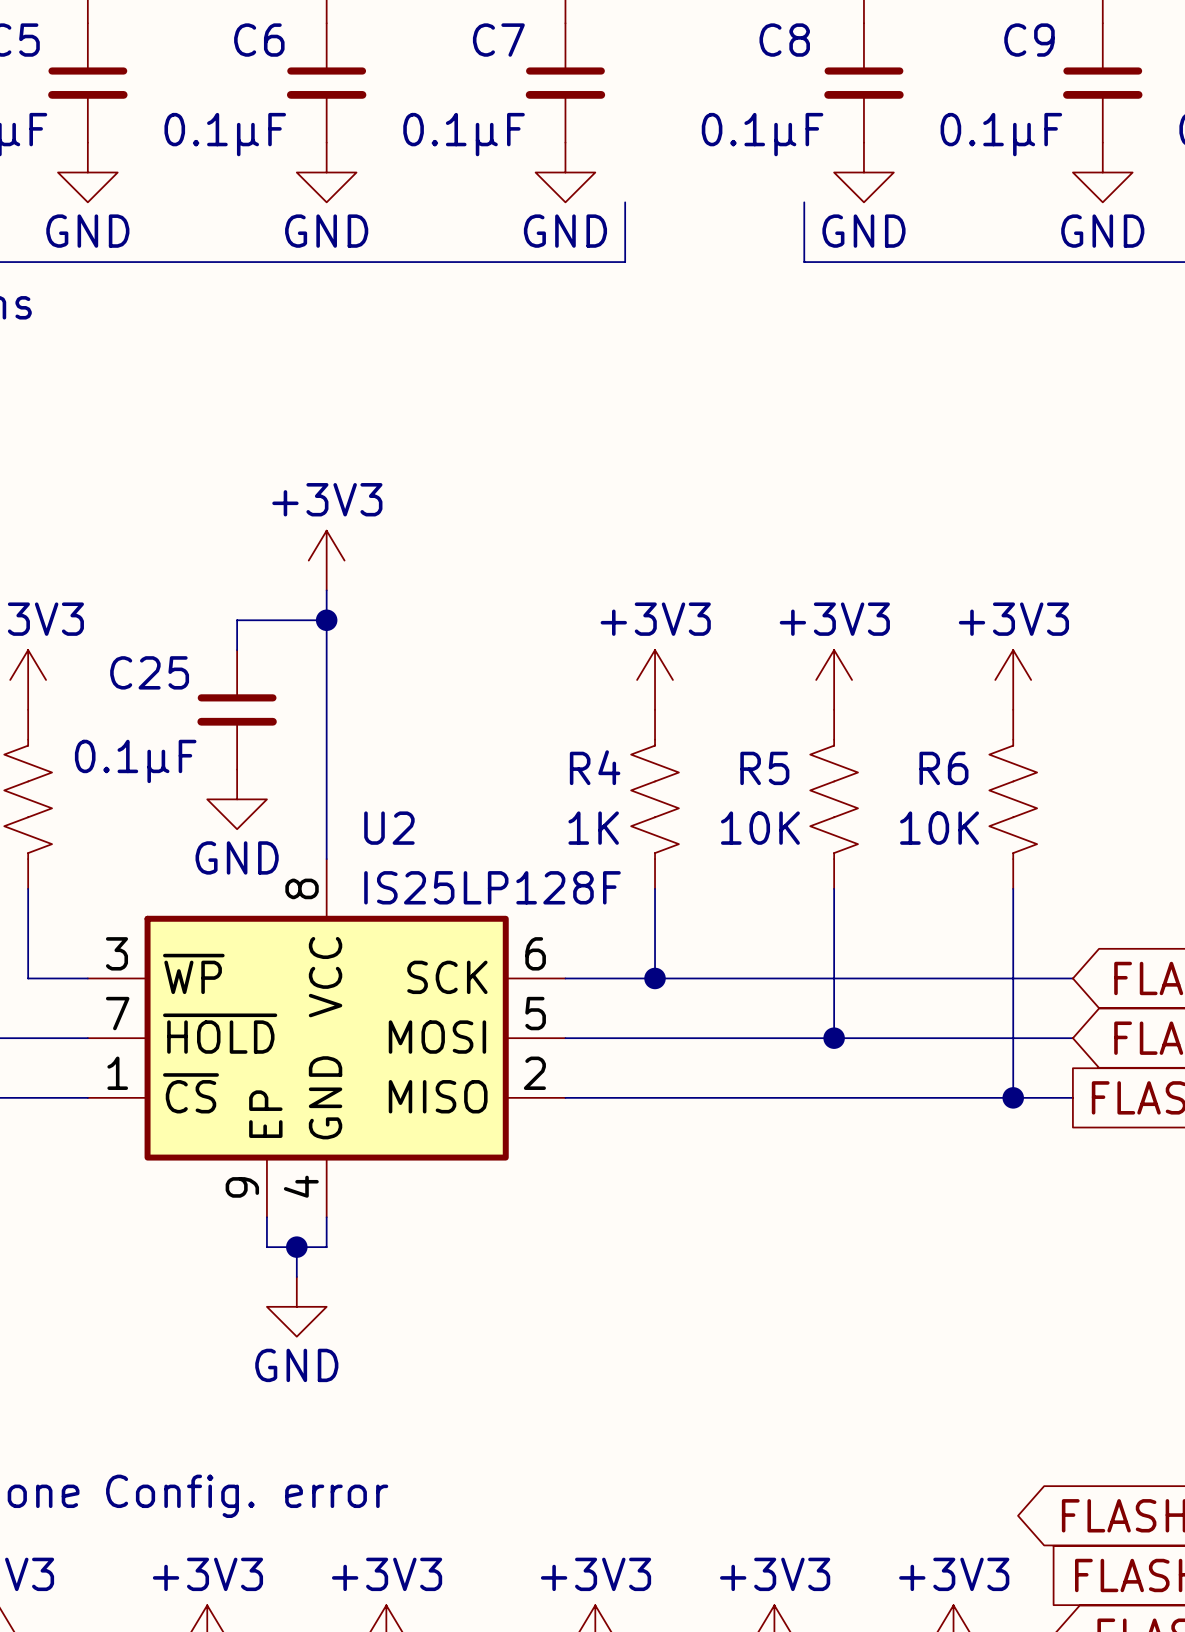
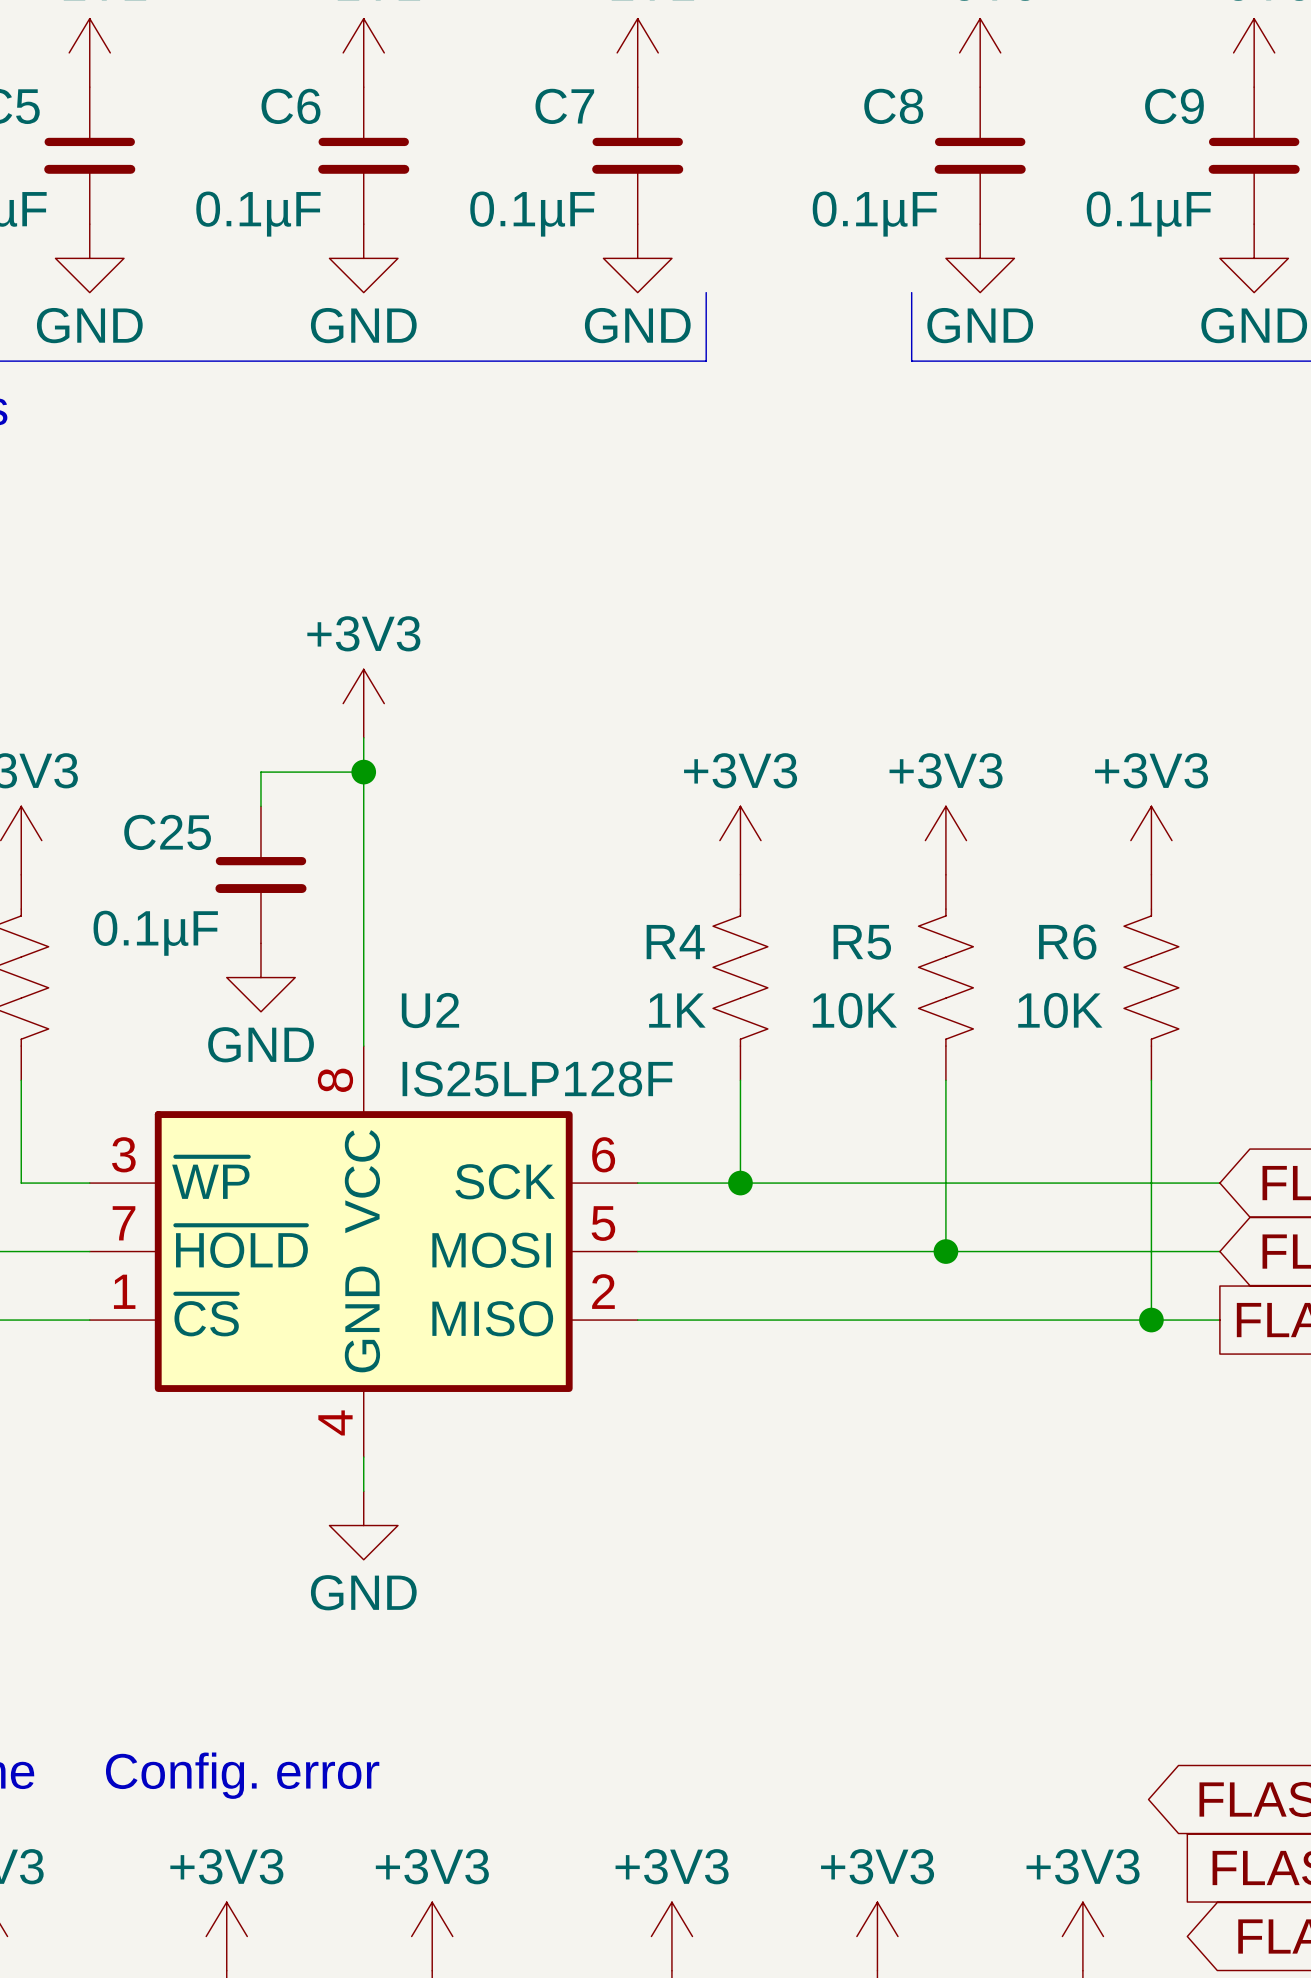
U2 symbol: [87, 859, 566, 1218] -> [89, 1046, 638, 1458]
wire: (266, 1217) (266, 1247) (326, 1247) -> none
wire: (296, 1247) (296, 1276) -> none
junction: (296, 1247) -> none
power symbol position: GND (296, 1306) -> GND (363, 1525)

